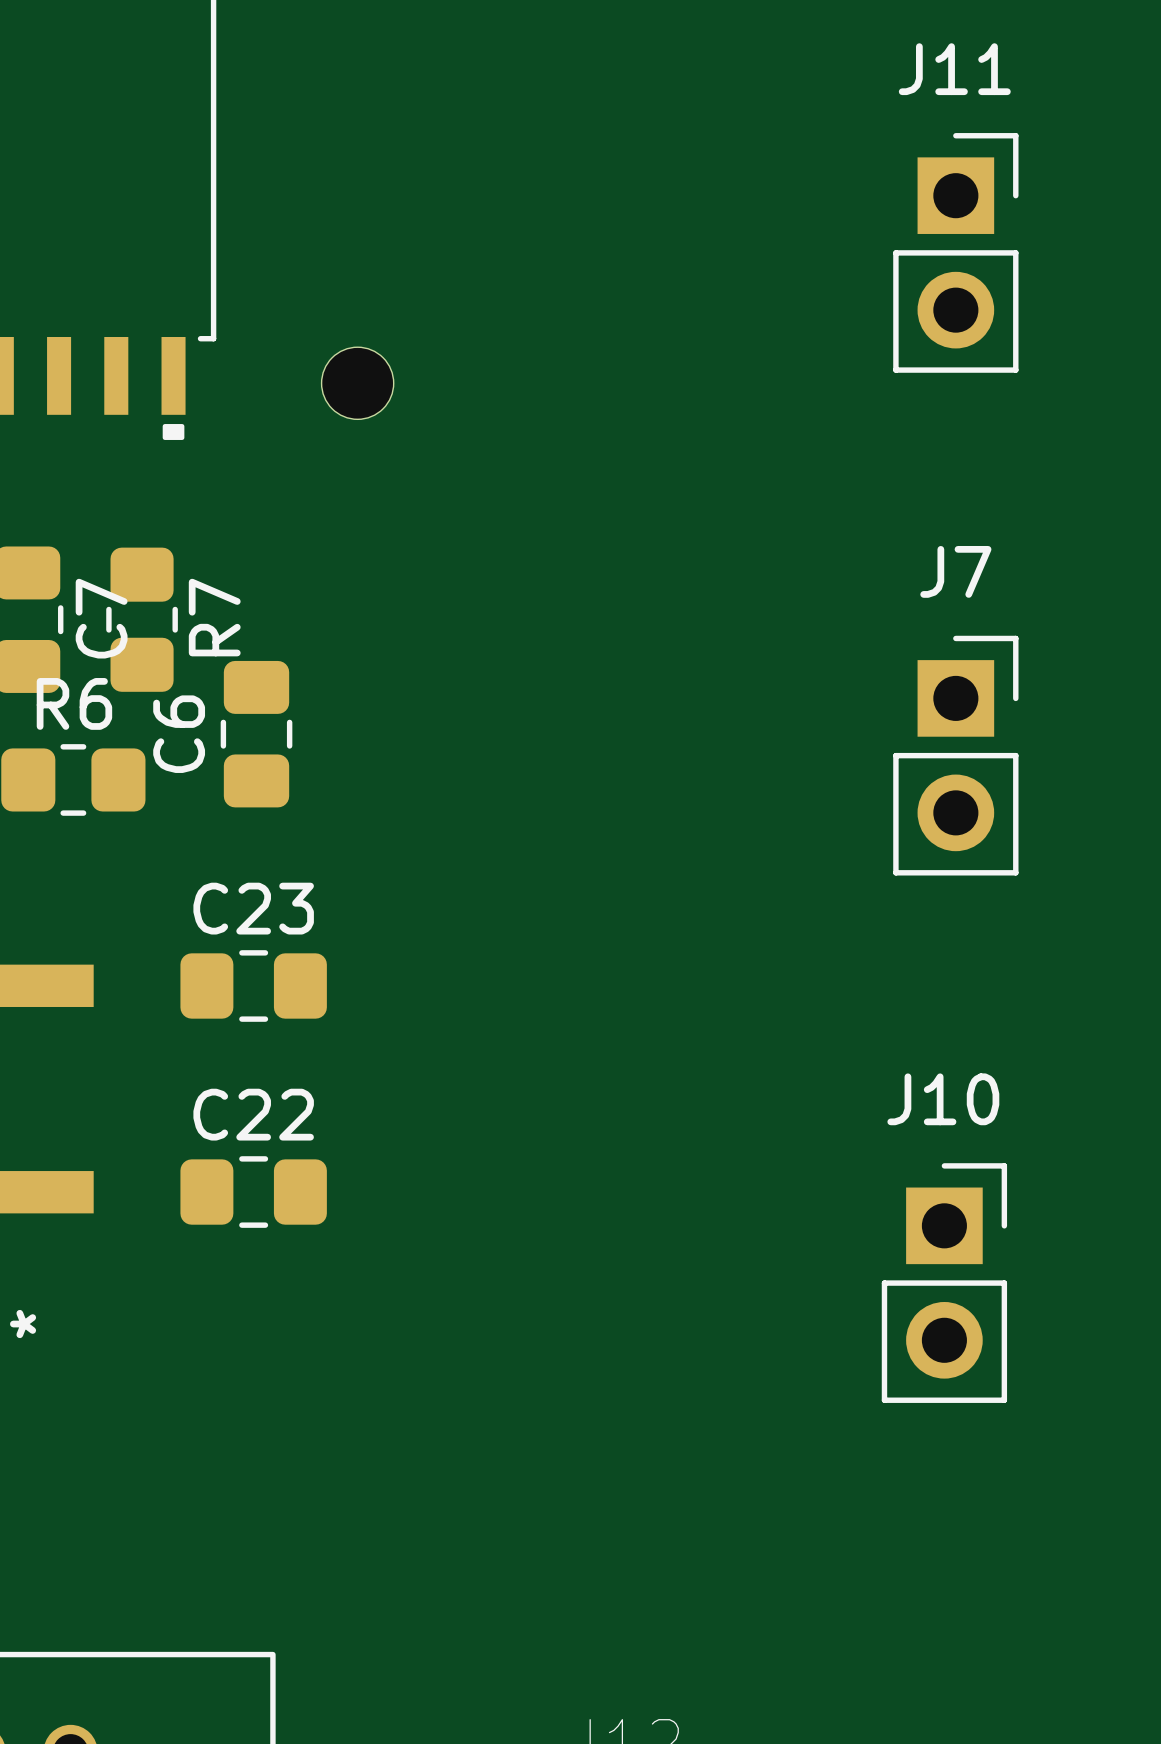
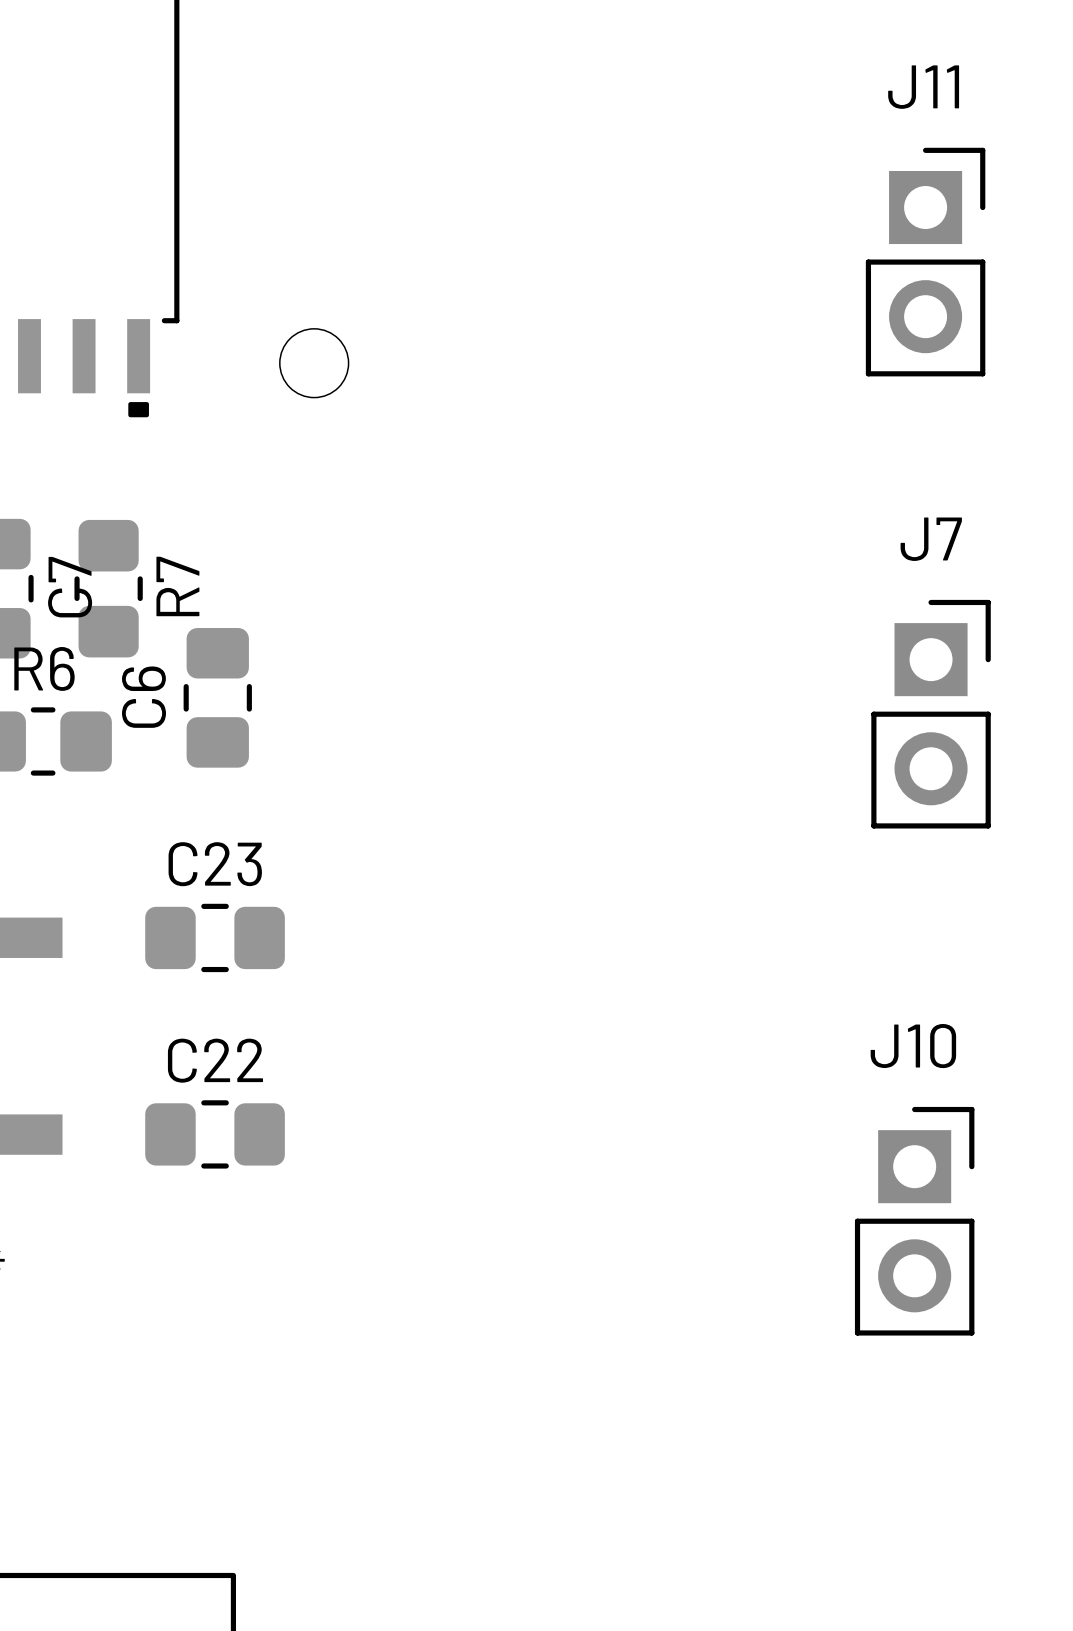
J11 position: (955, 252) -> (925, 262)
J7 position: (955, 755) -> (931, 714)
J10 position: (944, 1283) -> (914, 1221)

